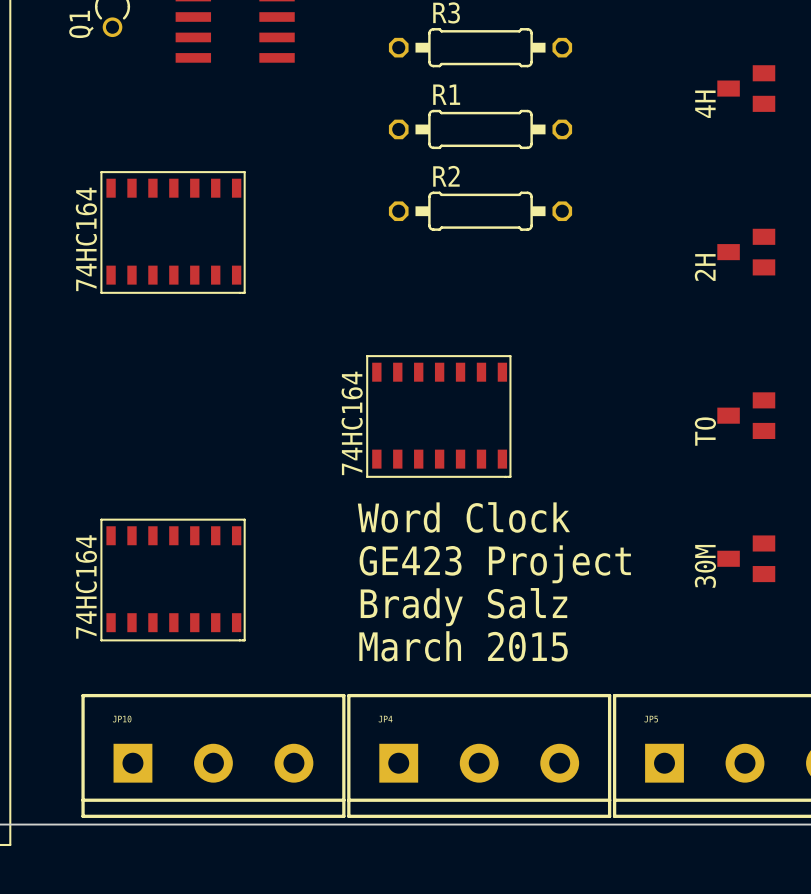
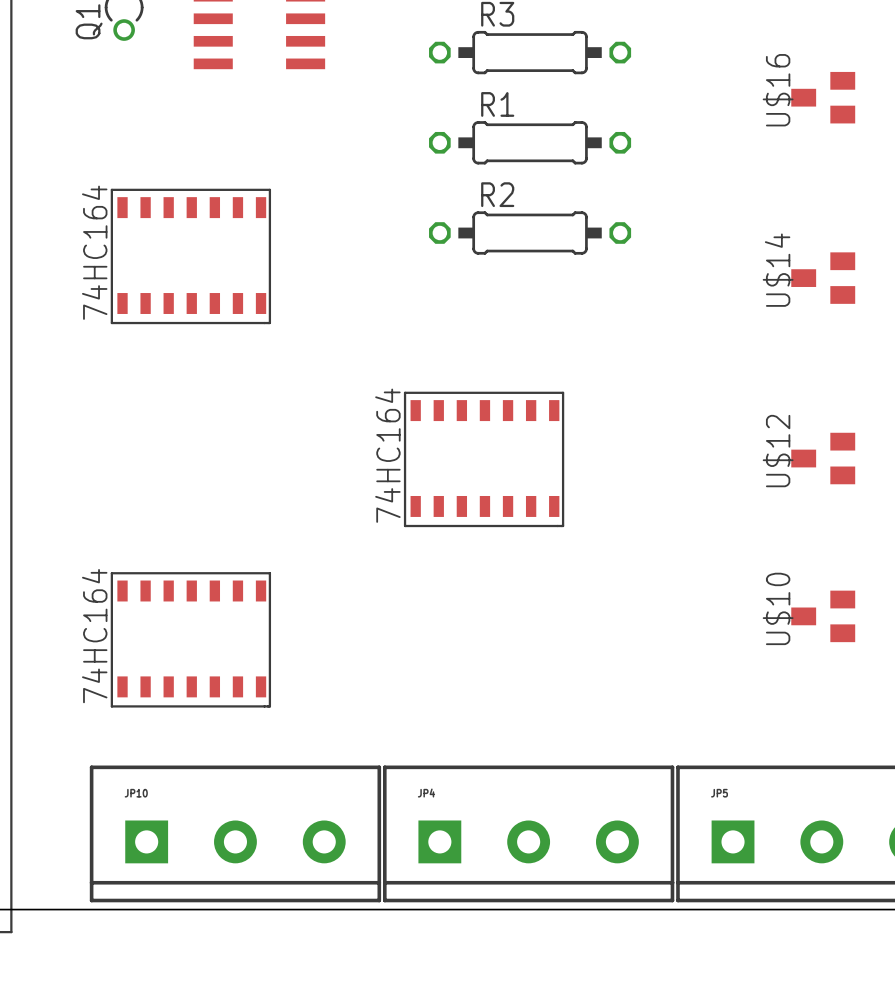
4H name: 4H (705, 104) -> U$16 (778, 90)
2H name: 2H (705, 267) -> U$14 (778, 270)
TO name: TO (705, 431) -> U$12 (778, 451)
text: Word Clock (463, 517) -> none
text: GE423 Project (495, 564) -> none
30M name: 30M (705, 566) -> U$10 (778, 608)
text: Brady Salz (463, 607) -> none
text: March 2015 (463, 646) -> none

